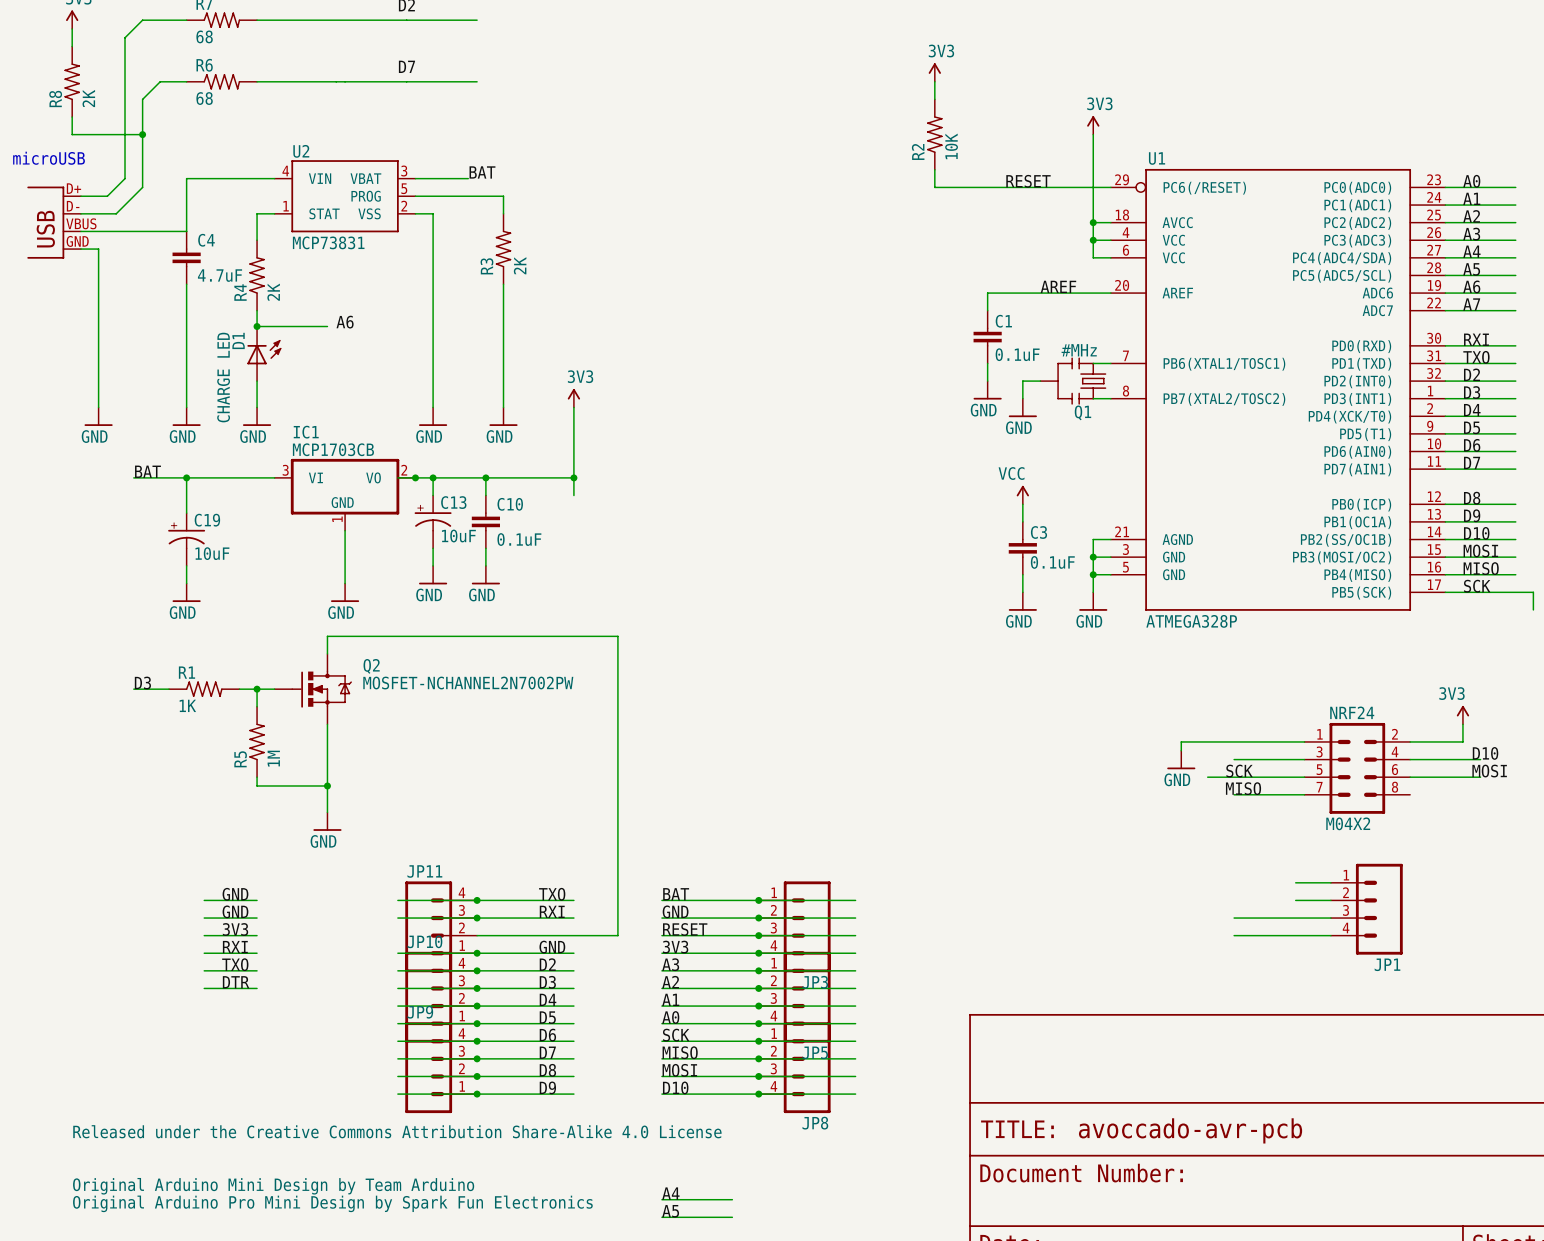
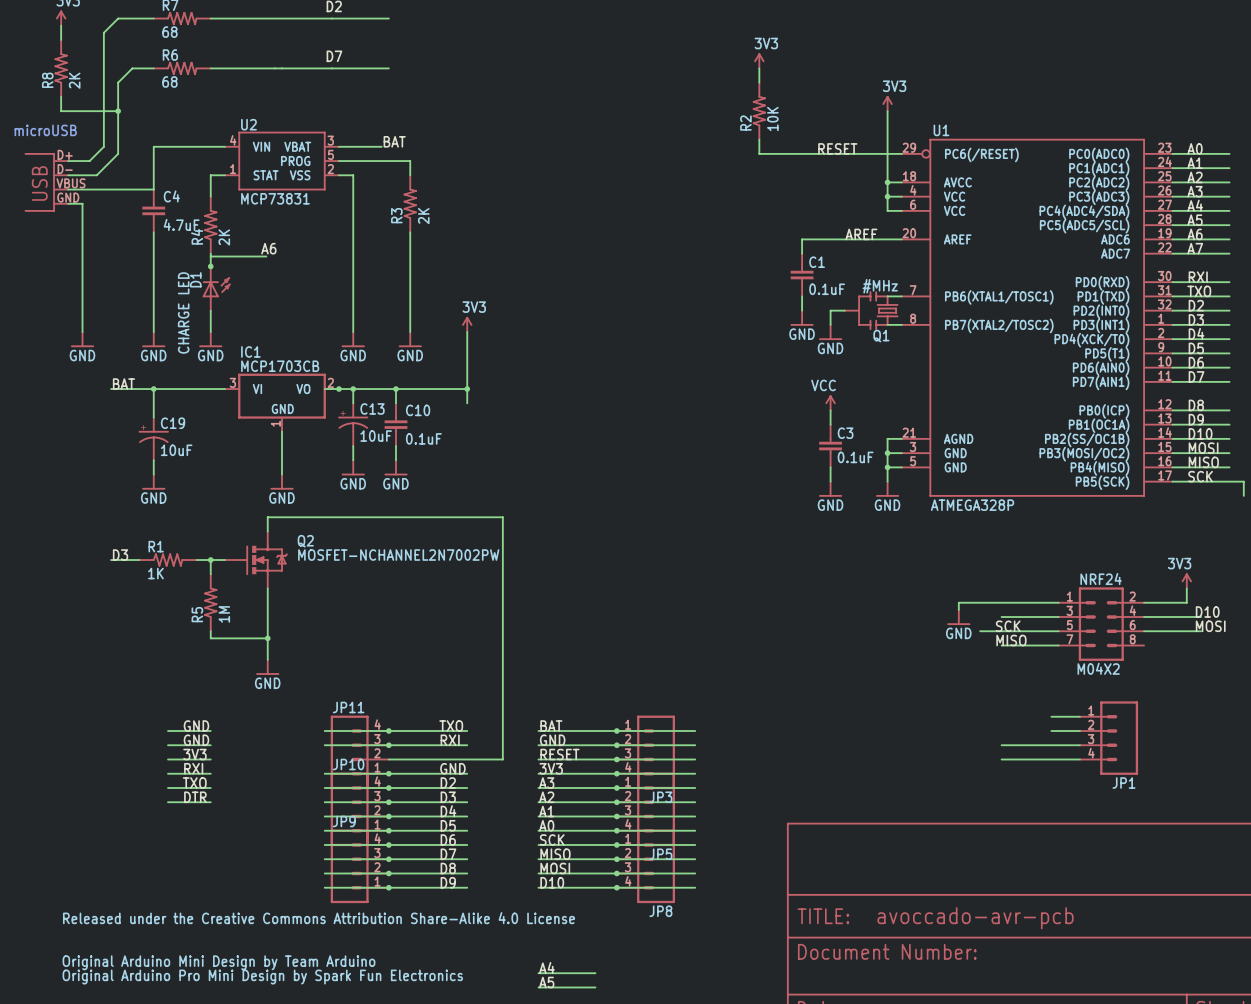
wire: none -> (210, 256) (266, 256)
label position: A6 (345, 322) -> A6 (268, 248)
wire: (257, 326) (327, 326) -> none

